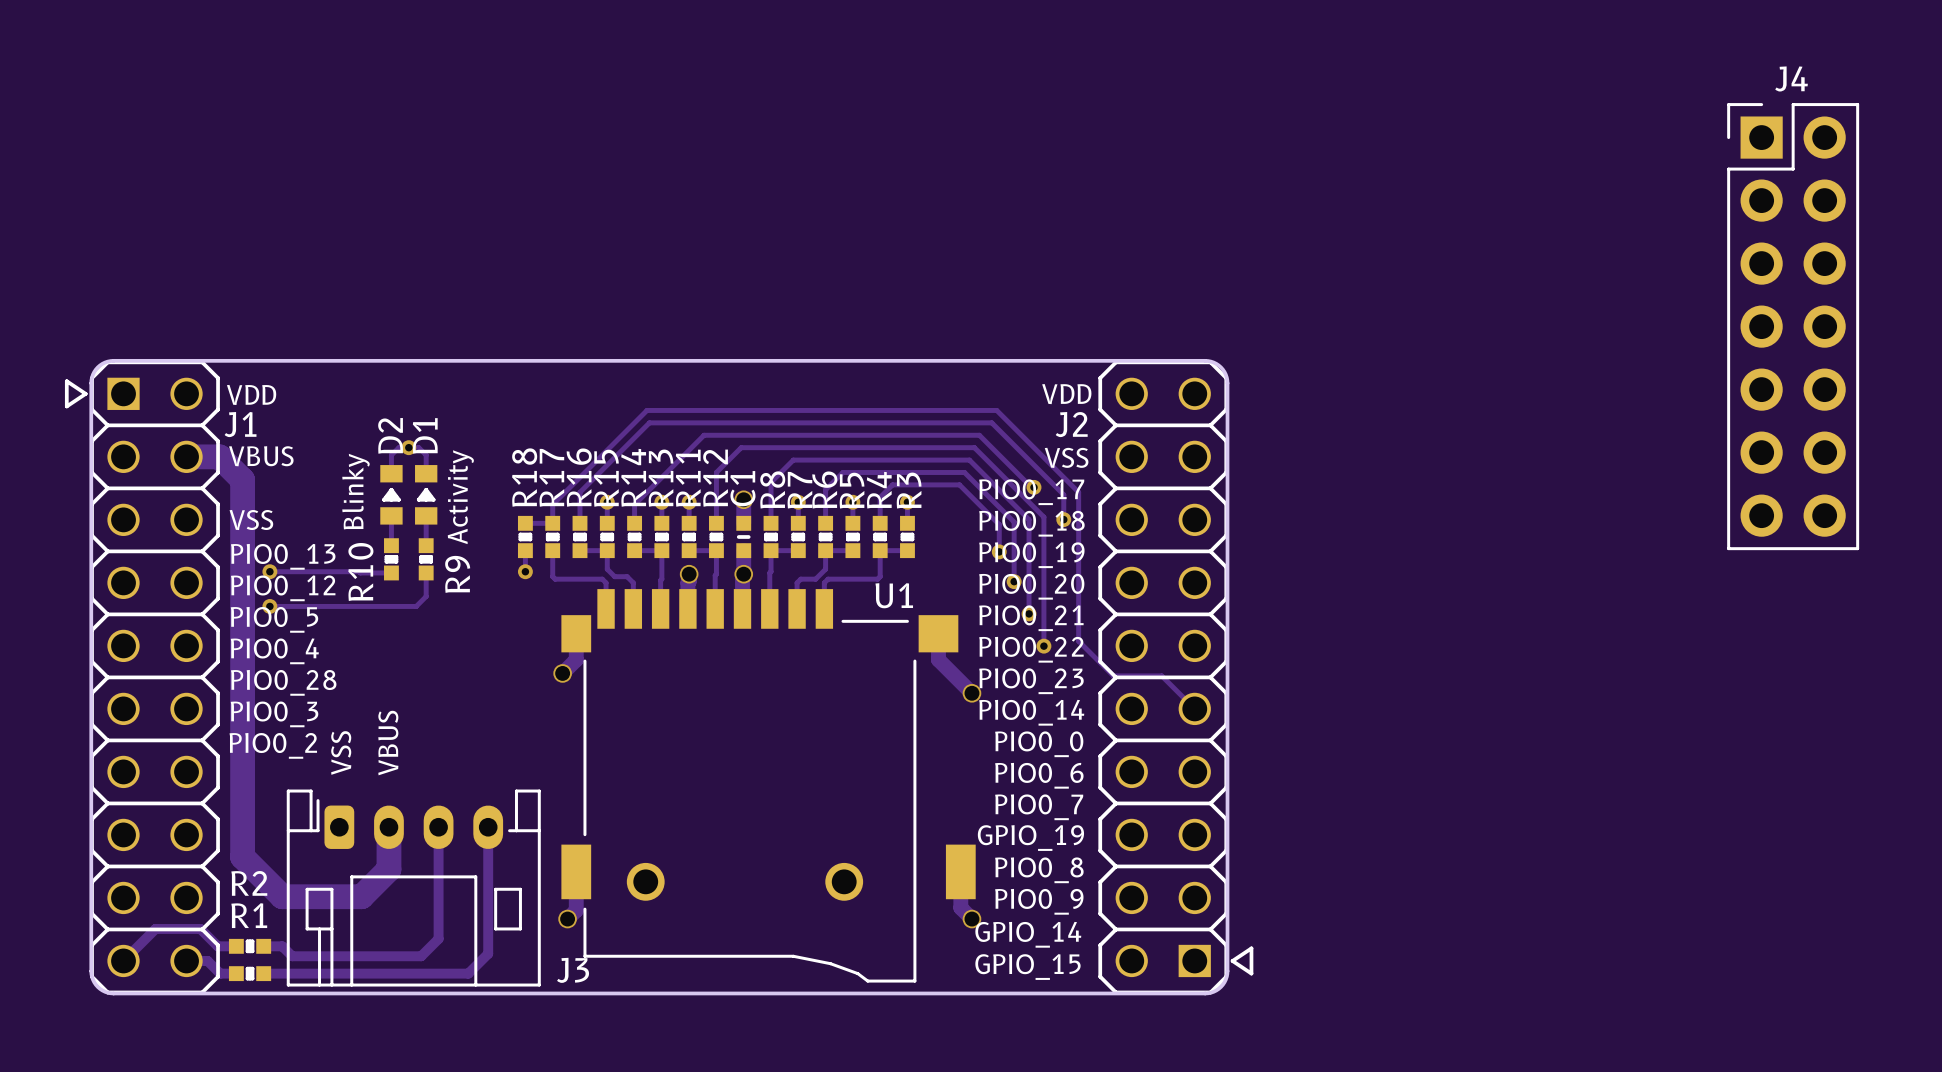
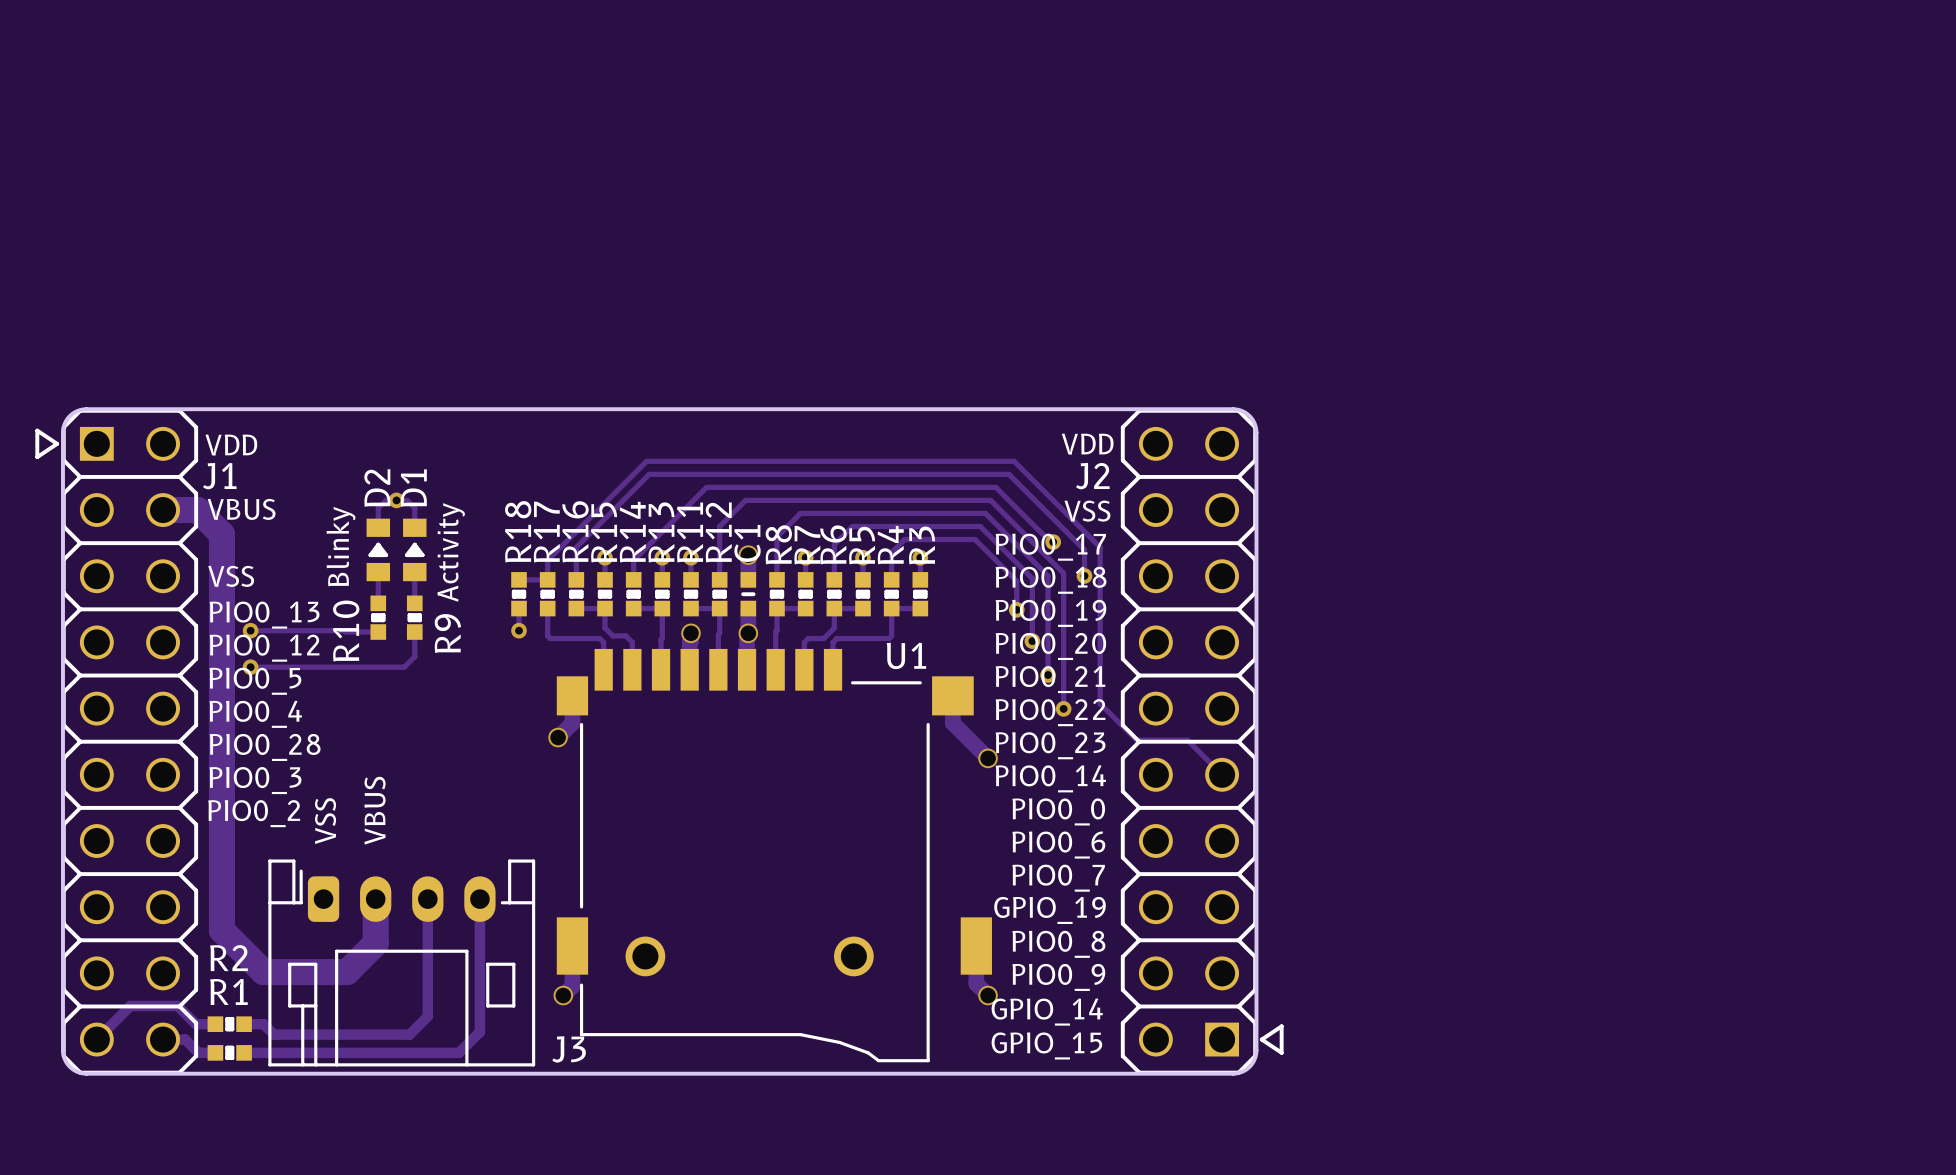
J4: (1793, 326) -> none

